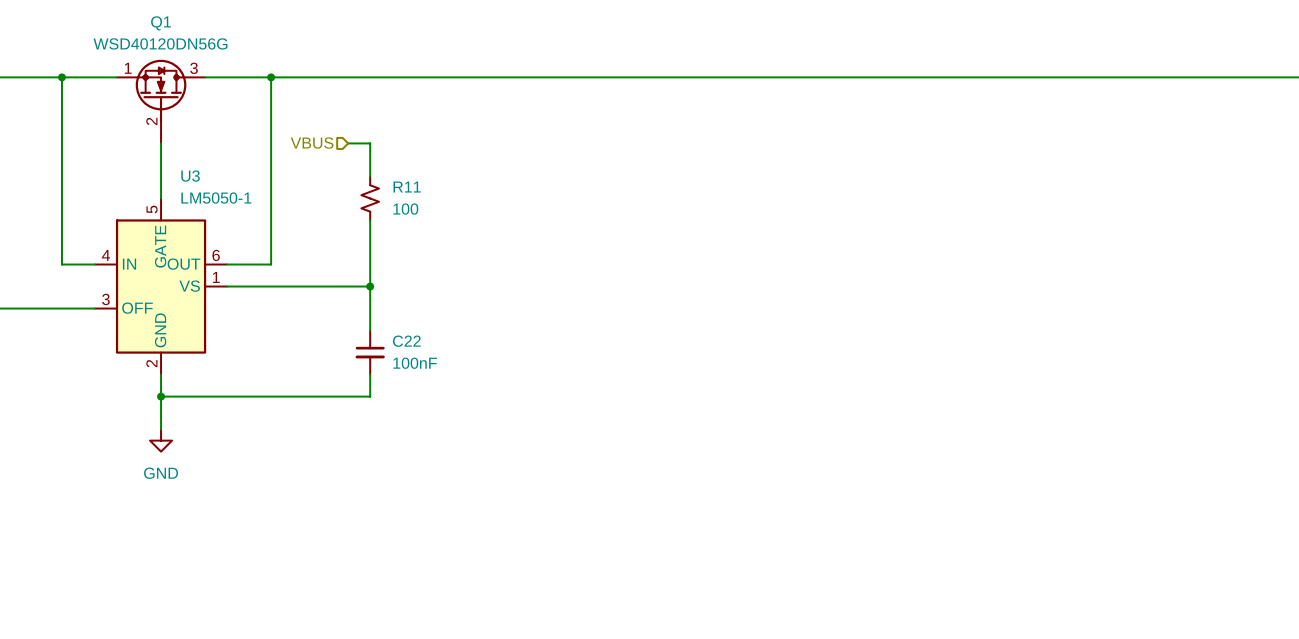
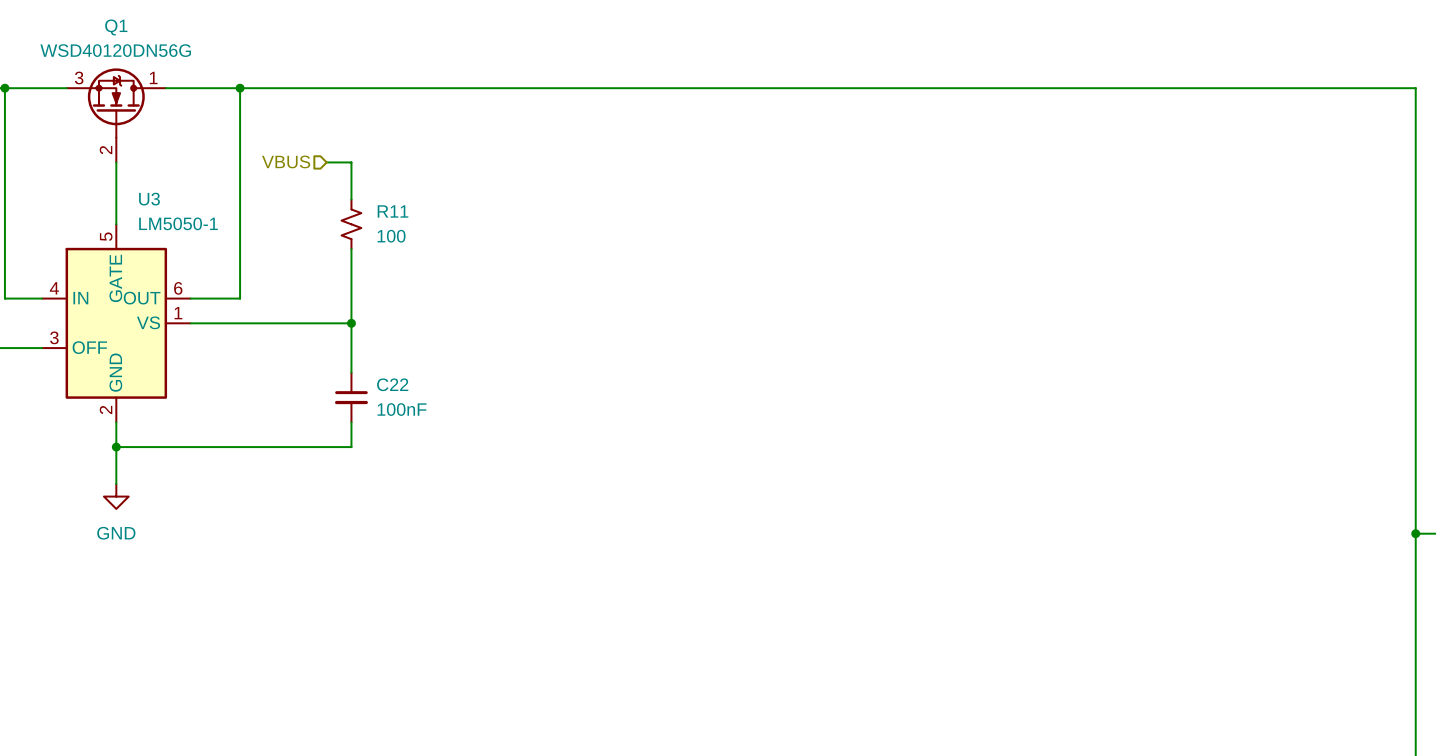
Q1 symbol: [117, 59, 206, 144] -> [66, 68, 166, 163]

